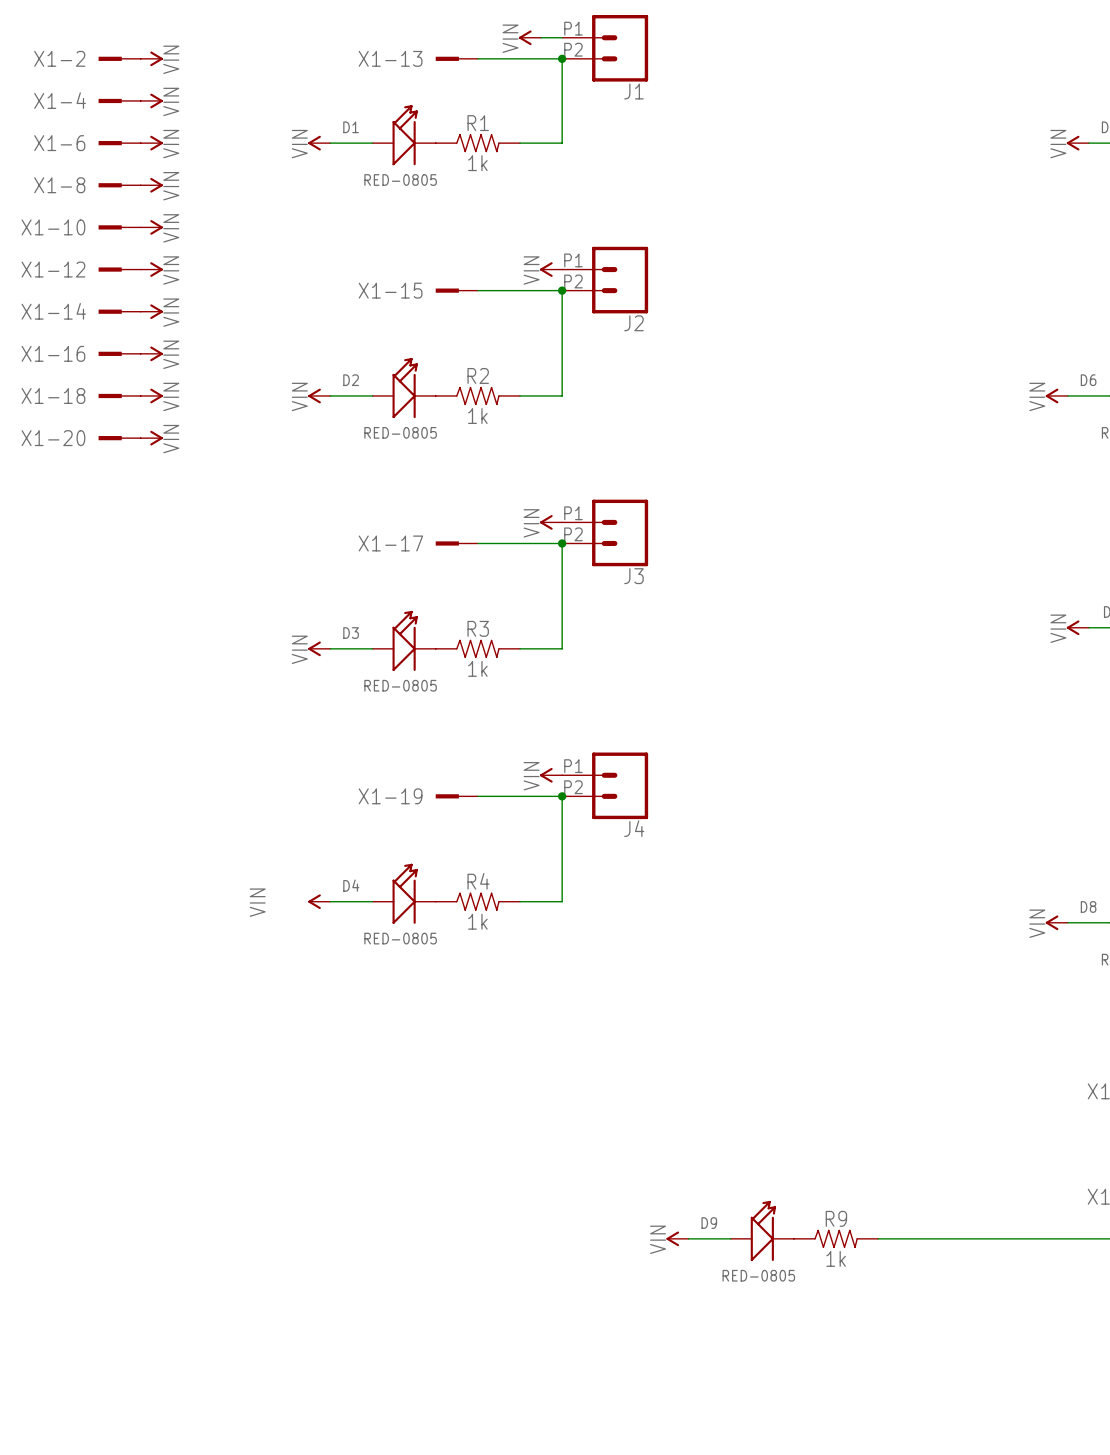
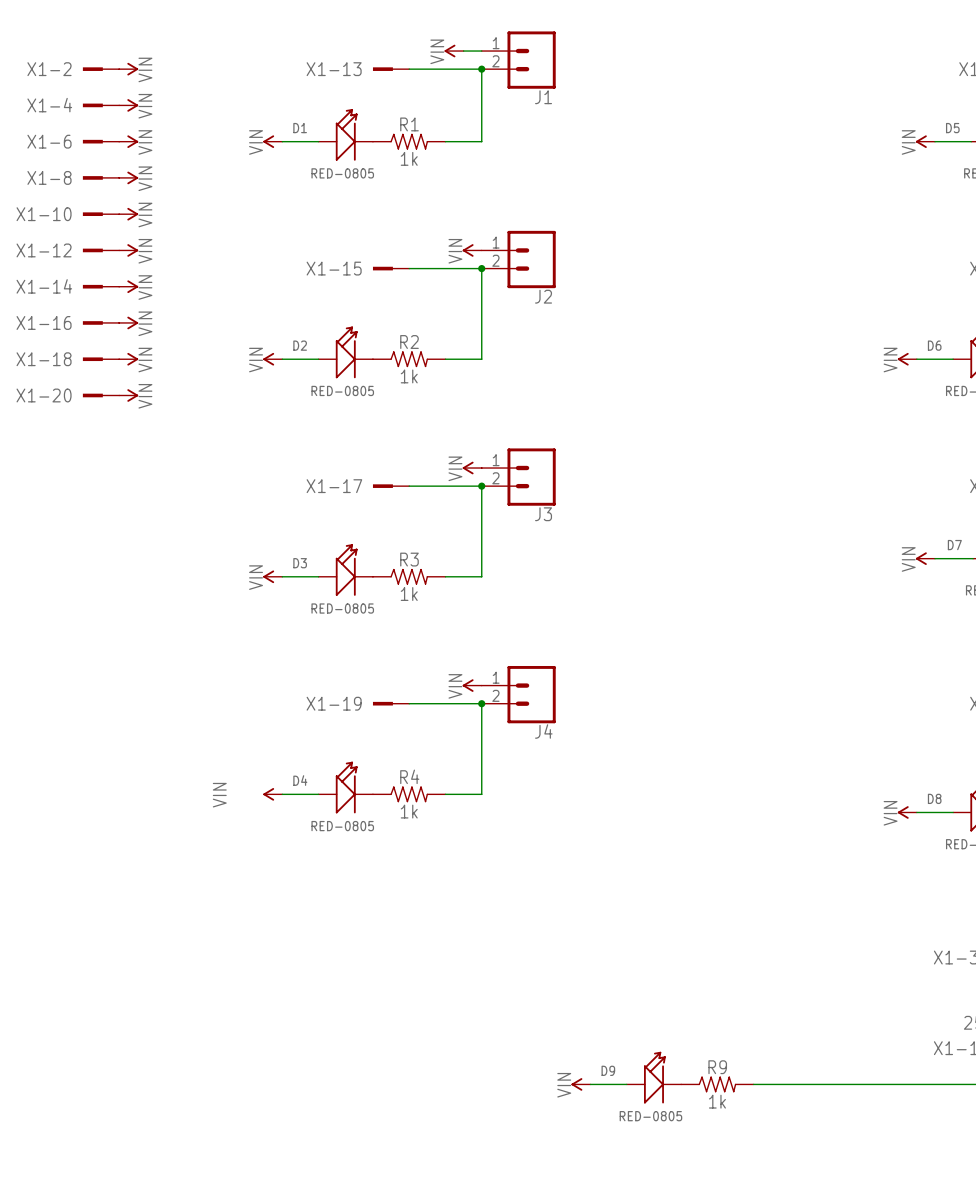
J1 pin number: P1 (573, 28) -> 1 (496, 43)
J1 pin number: P2 (573, 49) -> 2 (495, 61)
J2 pin number: P1 (573, 260) -> 1 (496, 242)
J2 pin number: P2 (573, 281) -> 2 (495, 260)
J3 pin number: P1 (573, 513) -> 1 (496, 460)
J3 pin number: P2 (573, 534) -> 2 (495, 478)
J4 pin number: P1 (573, 766) -> 1 (496, 677)
J4 pin number: P2 (573, 787) -> 2 (495, 695)

